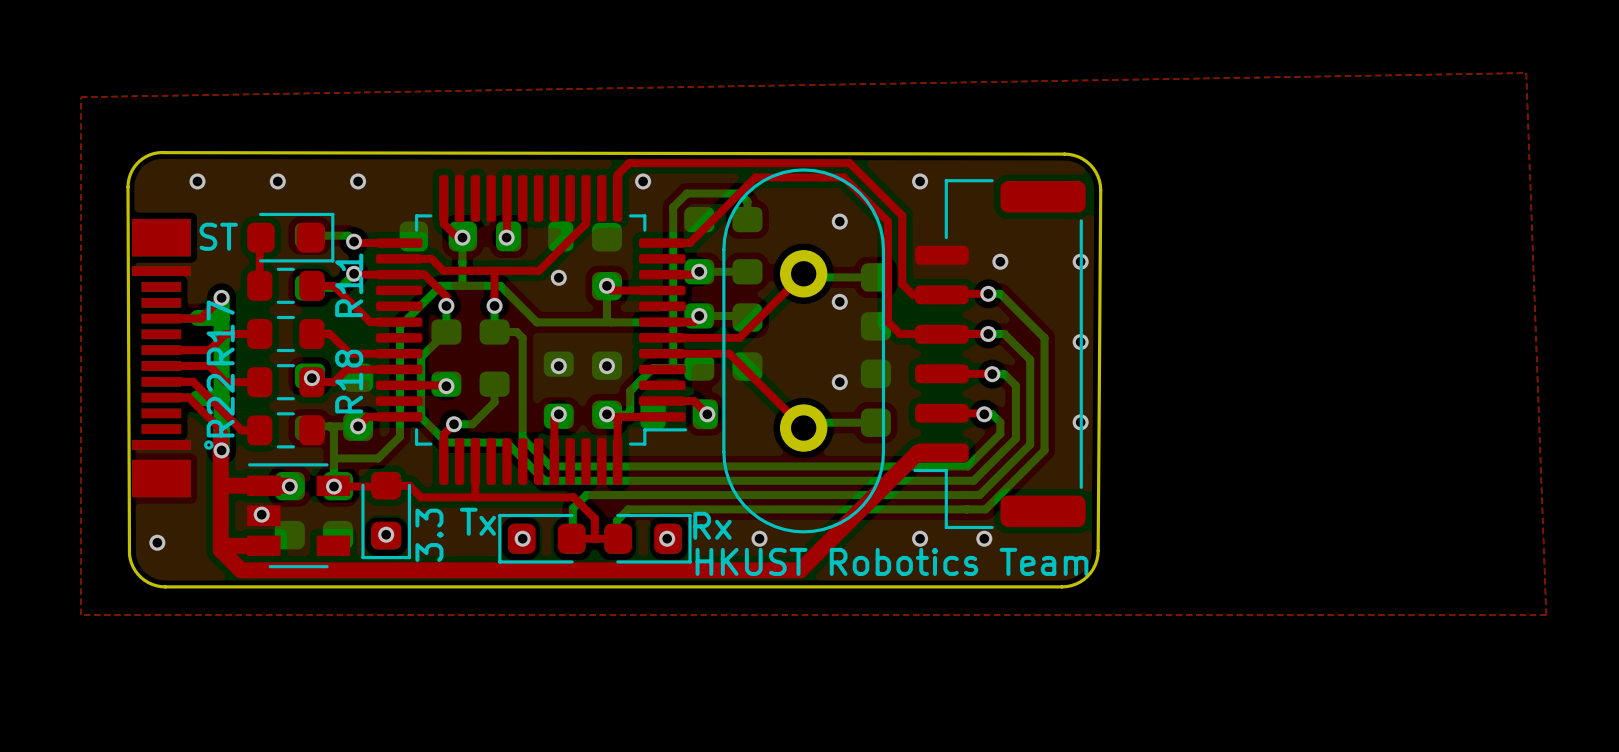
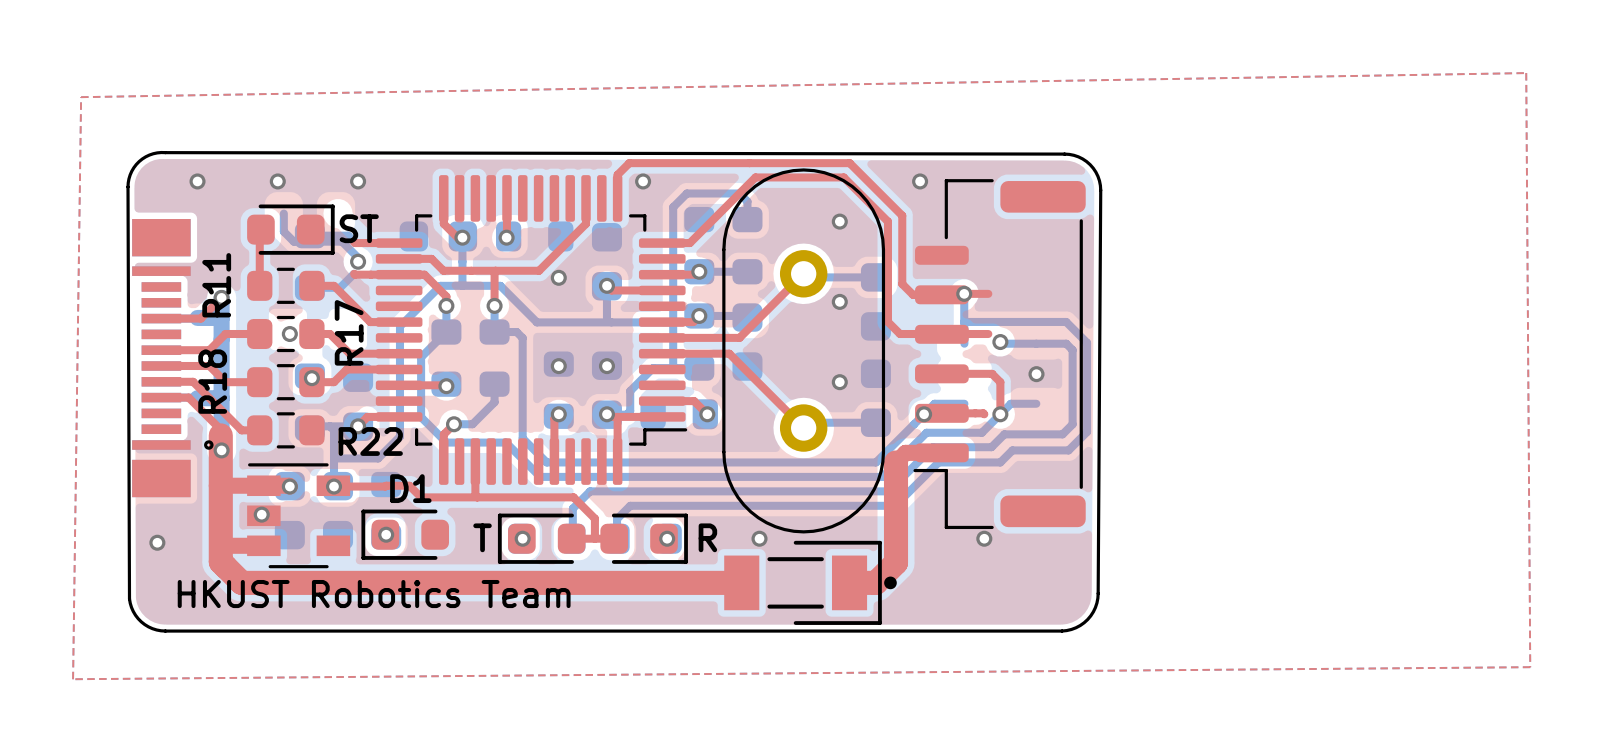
top zone outline: (1526, 73) (1546, 615) (81, 615) (81, 97) -> (1526, 73) (1530, 667) (73, 679) (81, 97)
board edge: (128, 186) (129, 554) (133, 567) (141, 577) (152, 584) (165, 586) (1062, 586) (1075, 584) (1084, 579) (1093, 568) (1098, 550) (1100, 190) -> (128, 186) (129, 598) (133, 611) (141, 621) (152, 628) (165, 631) (1062, 631) (1075, 627) (1084, 622) (1093, 611) (1098, 593) (1100, 190)
ST footprint: [247, 212, 335, 263] -> [247, 204, 335, 255]
bottom track: none -> (283, 213) (283, 231) (293, 241) (342, 241) (358, 257) (358, 261)
ST name position: ST (218, 236) -> ST (359, 228)
via: (354, 241) -> none
via: (1000, 261) -> none
via: (1080, 261) -> none
via position: (354, 273) -> (358, 261)
R11 name position: R11 (349, 285) -> R11 (216, 285)
via: none -> (964, 293)
bottom track: (988, 293) (1000, 293) (1044, 338) (1044, 450) (985, 509) (628, 509) (617, 520) -> (964, 321) (1066, 321) (1087, 342) (1087, 431) (1068, 450) (1012, 450) (1000, 462) (938, 462) (895, 505) (630, 505) (617, 520)
via: (988, 293) -> none
R17 name position: R17 (220, 332) -> R17 (349, 332)
via: none -> (289, 334)
bottom track: (988, 334) (1004, 334) (1030, 359) (1030, 444) (979, 495) (586, 495) -> (1000, 342) (1002, 343) (1066, 343) (1072, 350) (1072, 424) (1062, 434) (1004, 434) (991, 447) (932, 447) (888, 491) (590, 491) (586, 495)
via position: (988, 334) -> (1000, 342)
via: (1080, 342) -> none
top track: none -> (992, 374) (1000, 382) (1000, 414)
bottom track: (992, 374) (1004, 374) (1015, 385) (1015, 438) (973, 480) (544, 480) (505, 442) -> (1036, 403) (1010, 403) (981, 432) (926, 432) (882, 476) (540, 476) (505, 442)
via: (992, 374) -> none
via: none -> (1036, 374)
R18 name position: R18 (349, 381) -> R18 (212, 381)
R22 name rotation: 0° (220, 405) -> 90° clockwise (370, 441)
R22 name position: R22 (220, 405) -> R22 (370, 441)
via: none -> (924, 414)
bottom track: (984, 414) (992, 414) (1000, 422) (1000, 433) (967, 466) (550, 466) (546, 462) -> (964, 403) (934, 403) (875, 462) (546, 462)
via position: (984, 414) -> (1000, 414)
via: (1080, 422) -> none
top track width: thin (220, 435) (220, 549) -> thick (220, 435) (220, 549)
top track: (917, 452) (800, 570) (241, 570) (220, 549) (224, 545) -> (917, 452) (905, 452) (896, 462) (896, 562) (875, 582) (849, 582)
3.3: (386, 515) -> none
D1: none -> (405, 534)
Tx: (541, 538) -> none
T: none -> (541, 538)
R: none -> (644, 538)
Rx: (648, 538) -> none
via: (920, 538) -> none
top track: none -> (220, 549) (220, 562) (241, 582) (741, 582)
text position: HKUST Robotics Team (891, 561) -> HKUST Robotics Team (374, 594)
part: none -> (810, 582)

